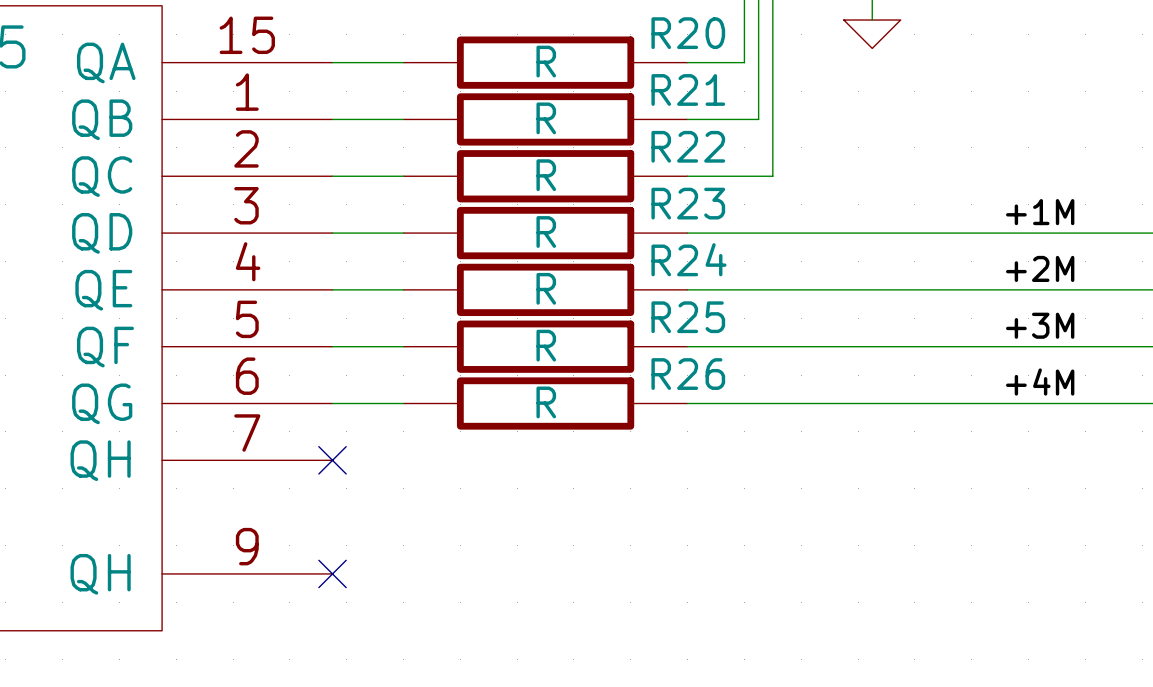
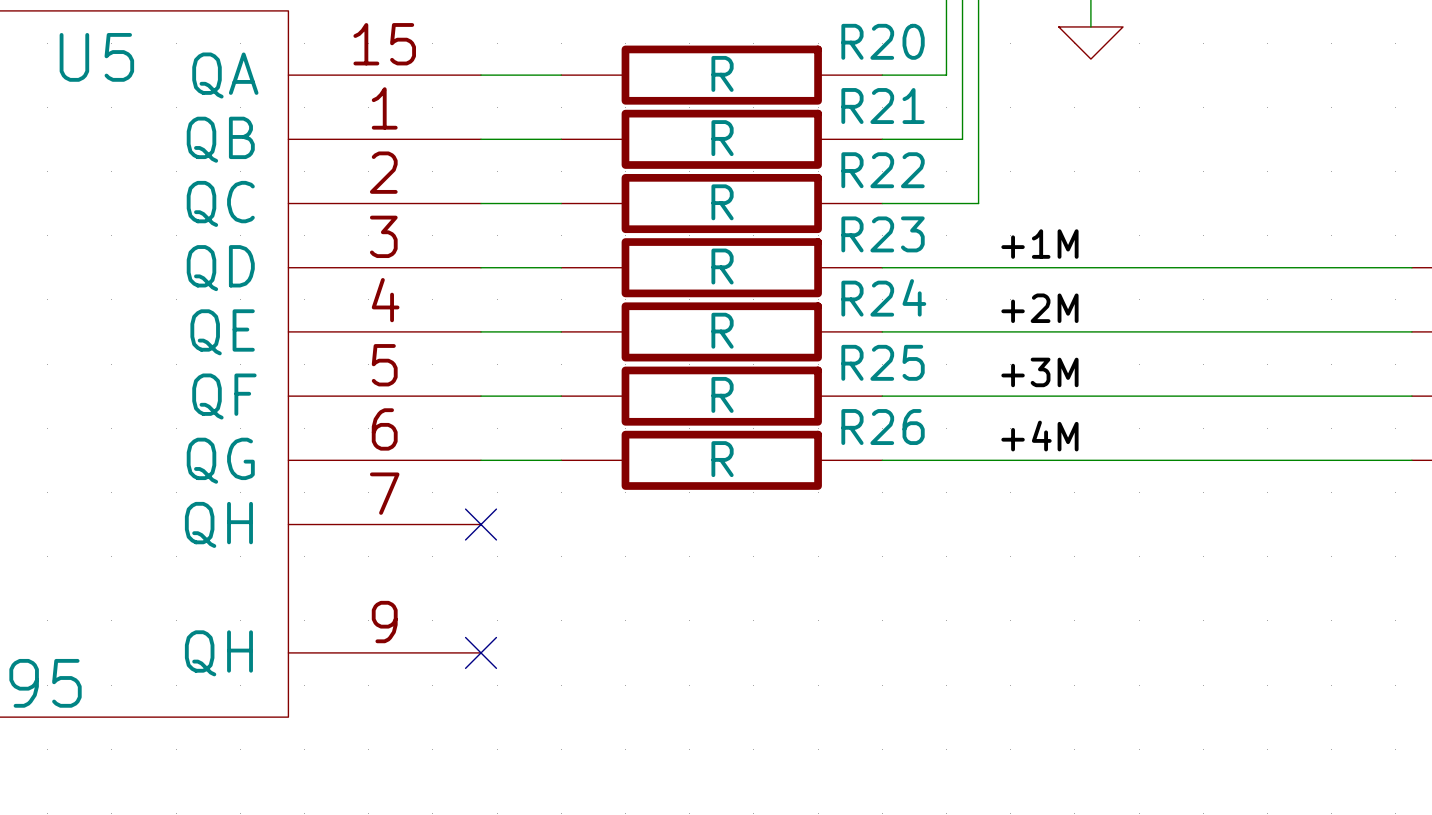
label position: +1M (1040, 212) -> +1M (1039, 244)
label position: +2M (1040, 268) -> +2M (1039, 308)
label position: +3M (1040, 325) -> +3M (1039, 372)
label position: +4M (1040, 382) -> +4M (1039, 436)

